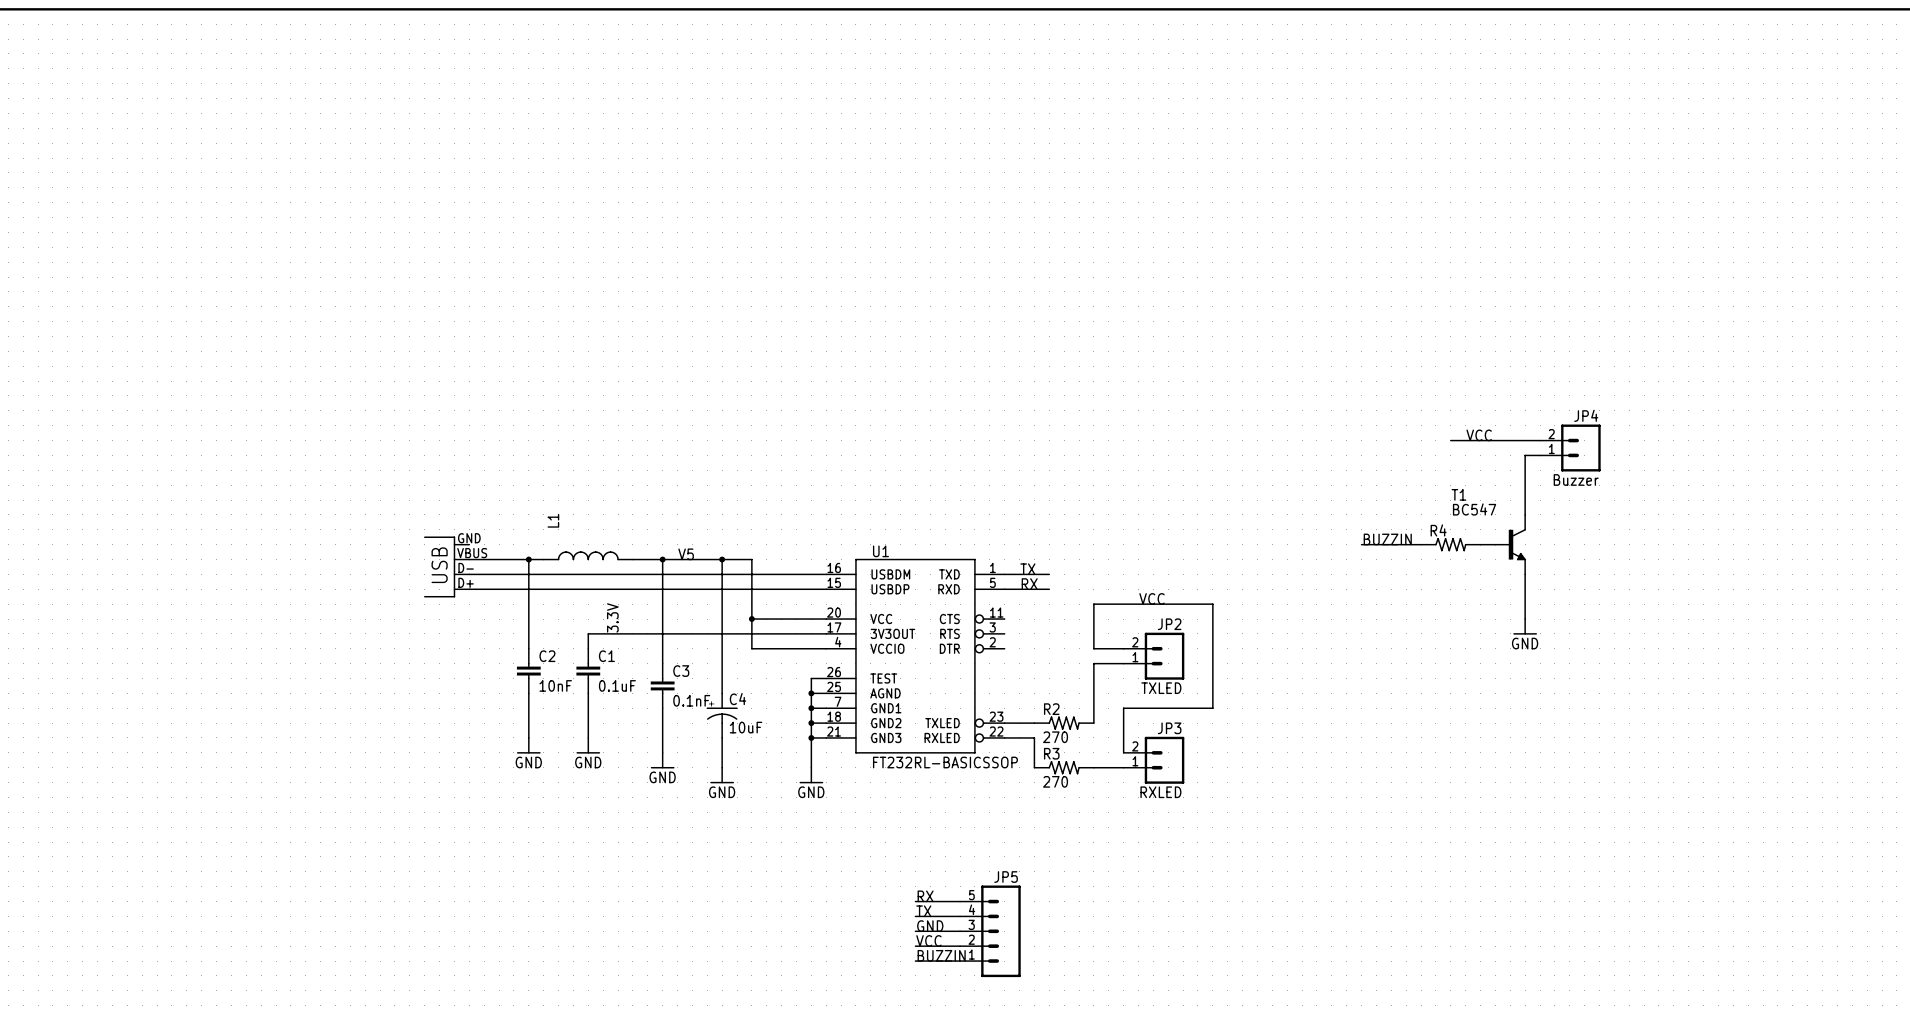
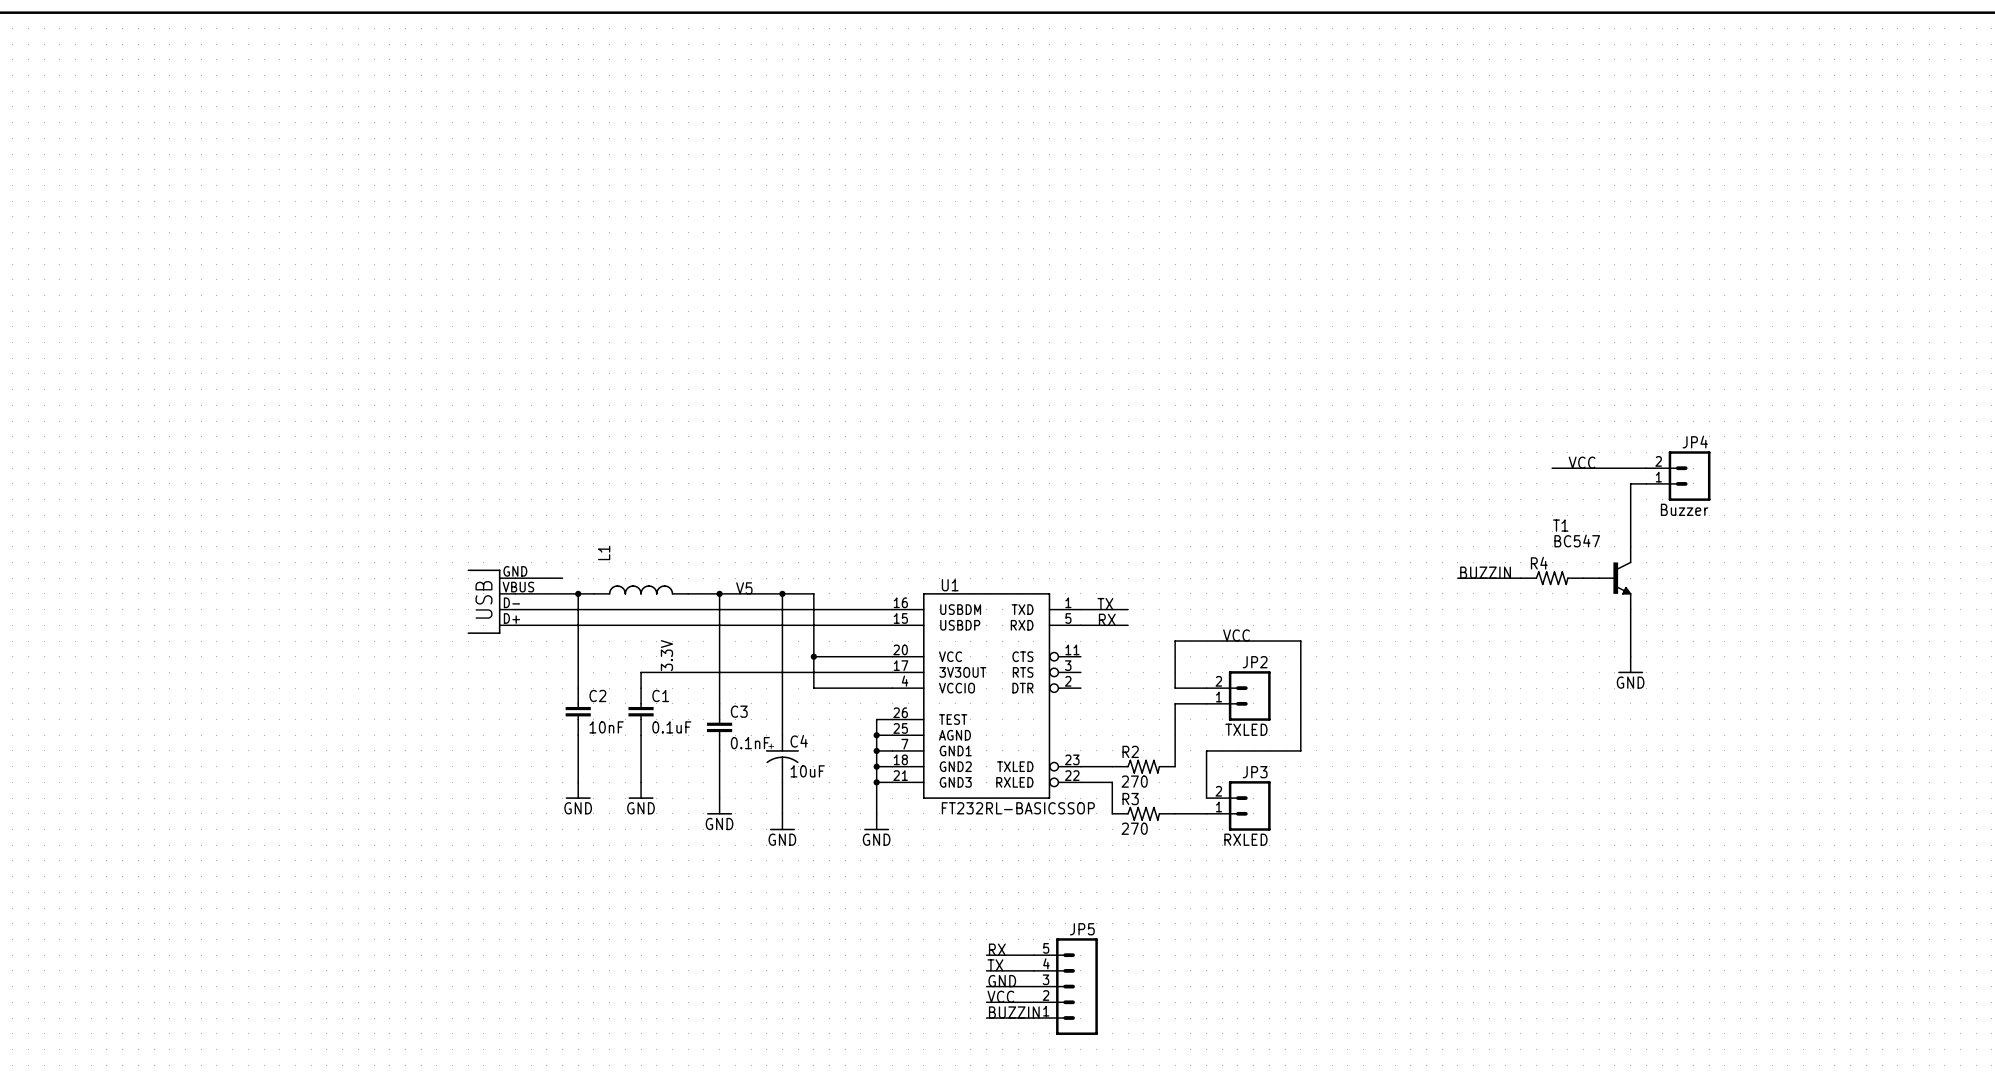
wire: none -> (515, 578) (562, 578)

